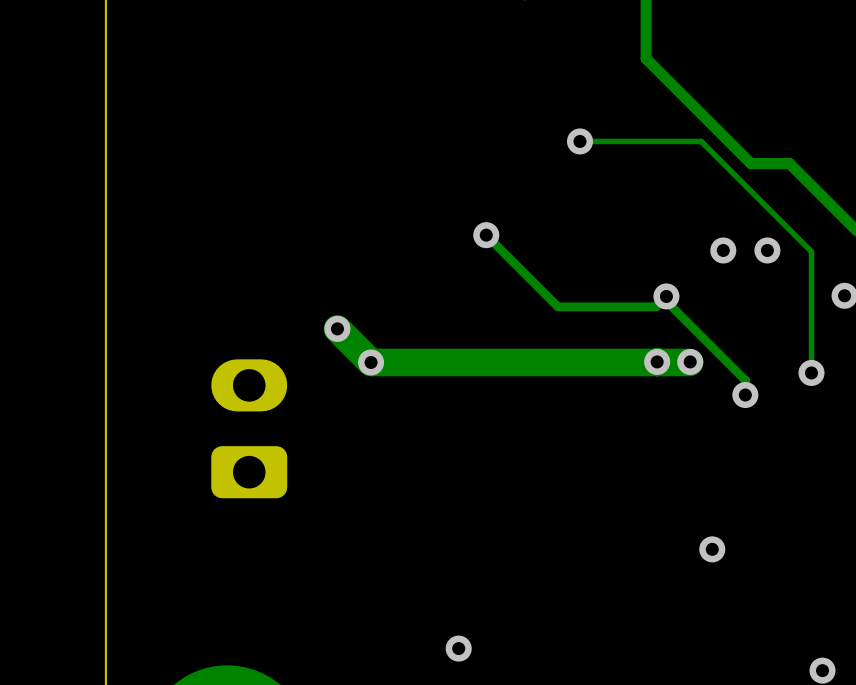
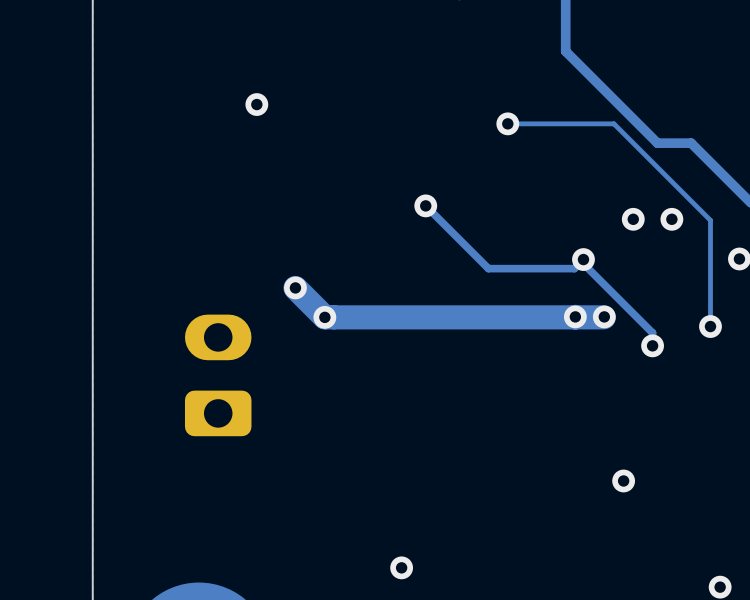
via: none -> (256, 104)

